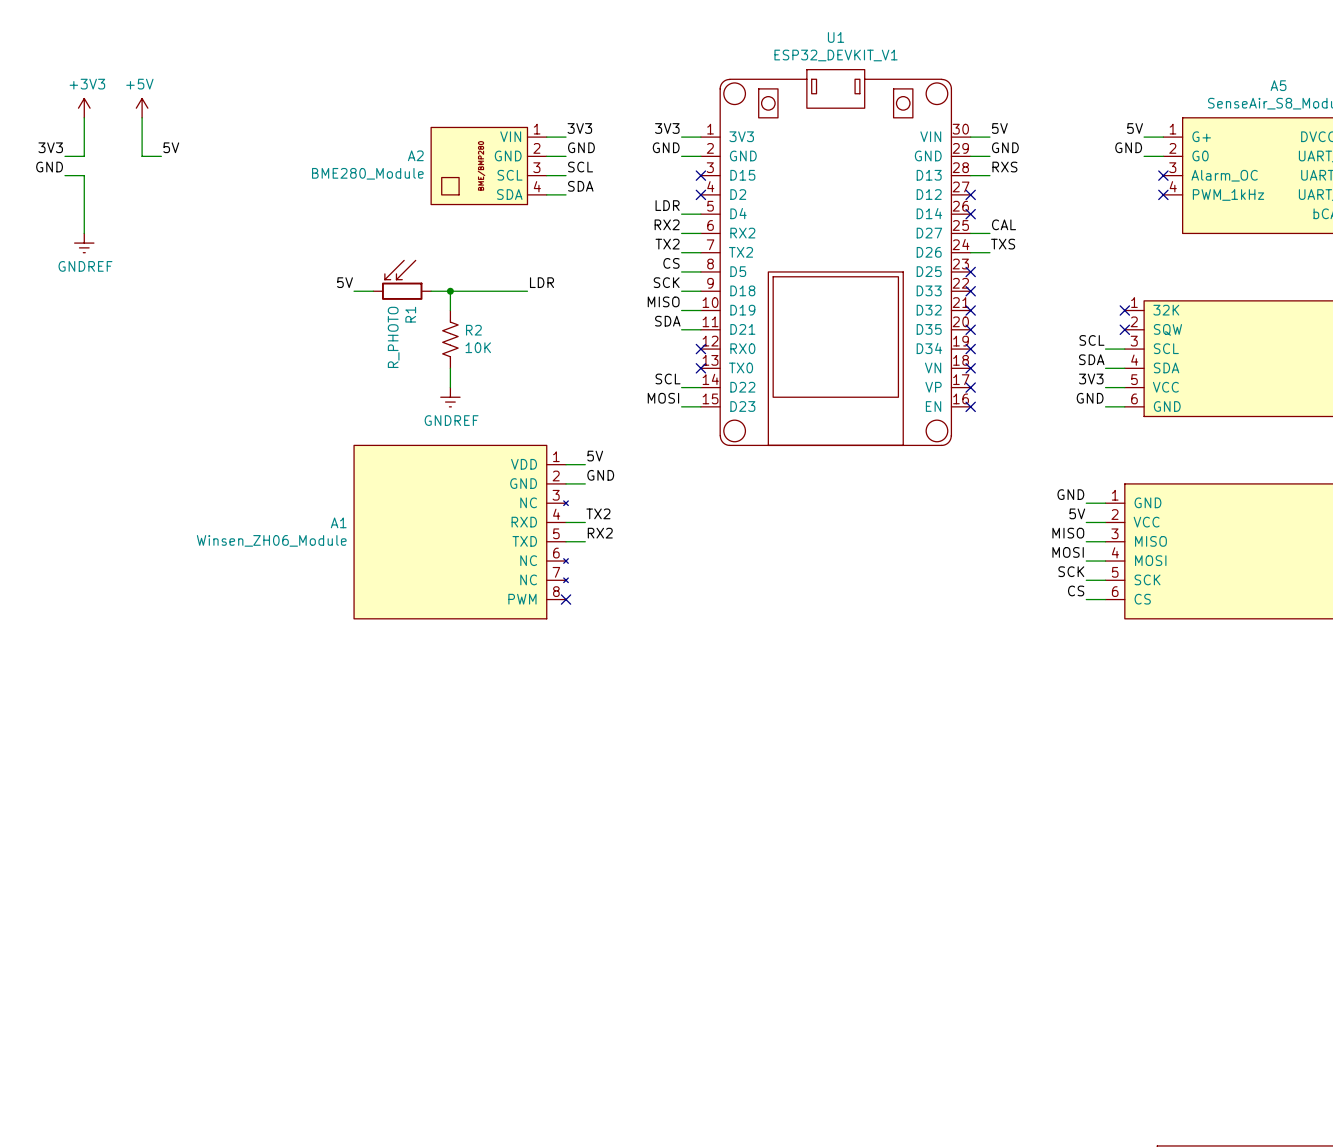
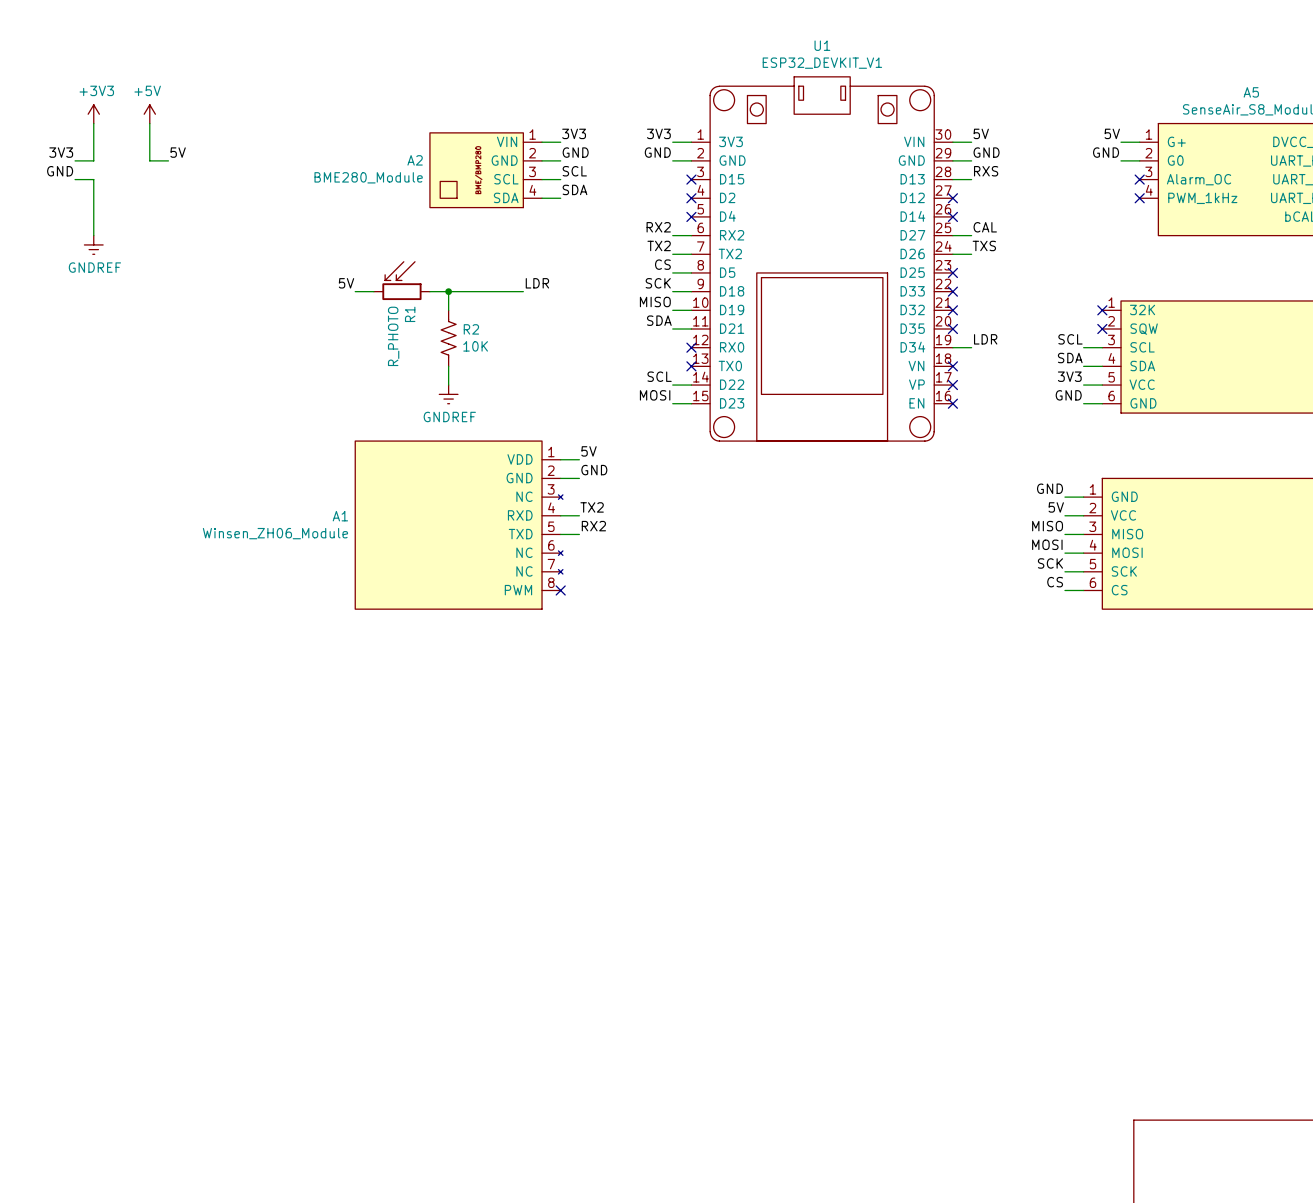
label: LDR (667, 205) -> none
wire: (681, 214) (700, 214) -> none
no-connect mark: none -> (691, 216)
label: none -> LDR (985, 339)
wire: none -> (952, 347) (971, 347)
no-connect mark: (970, 349) -> none

